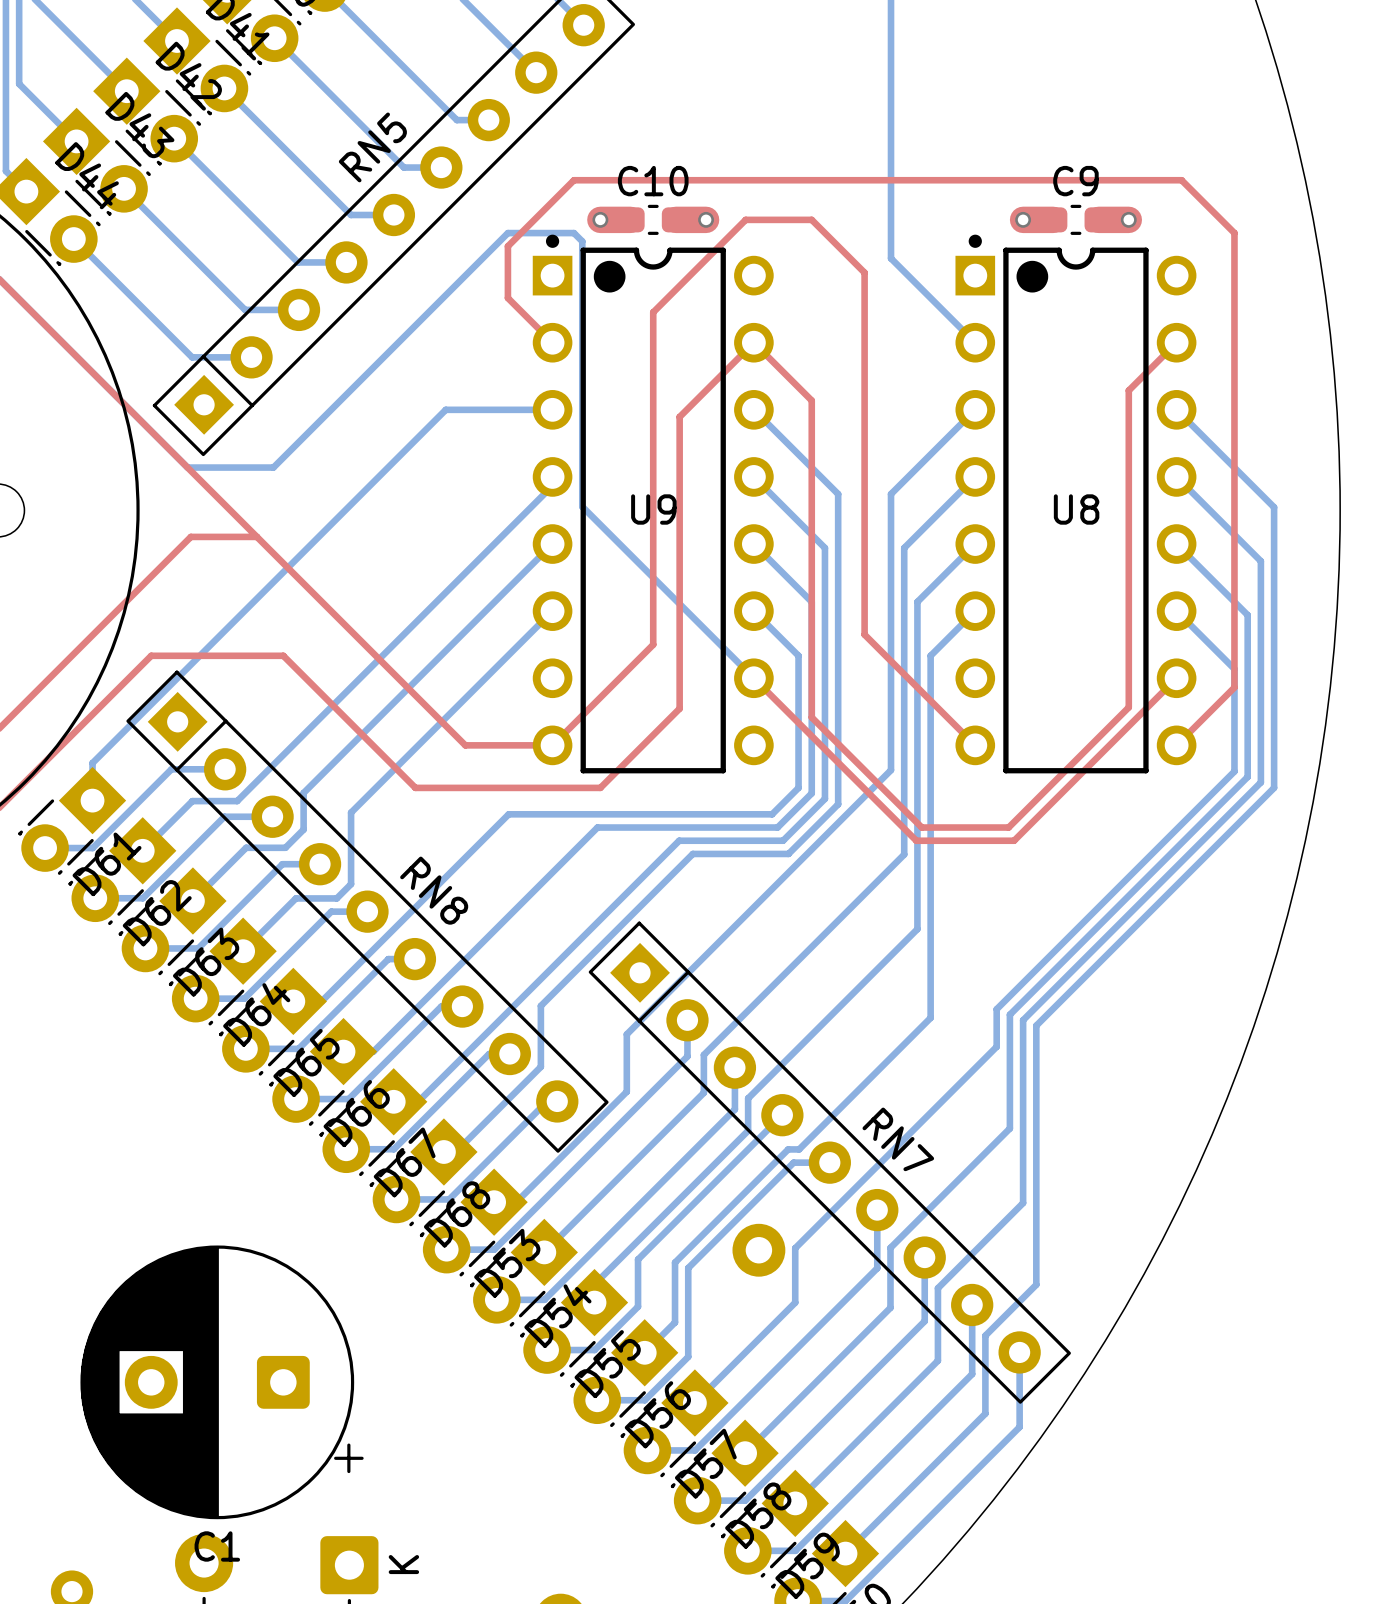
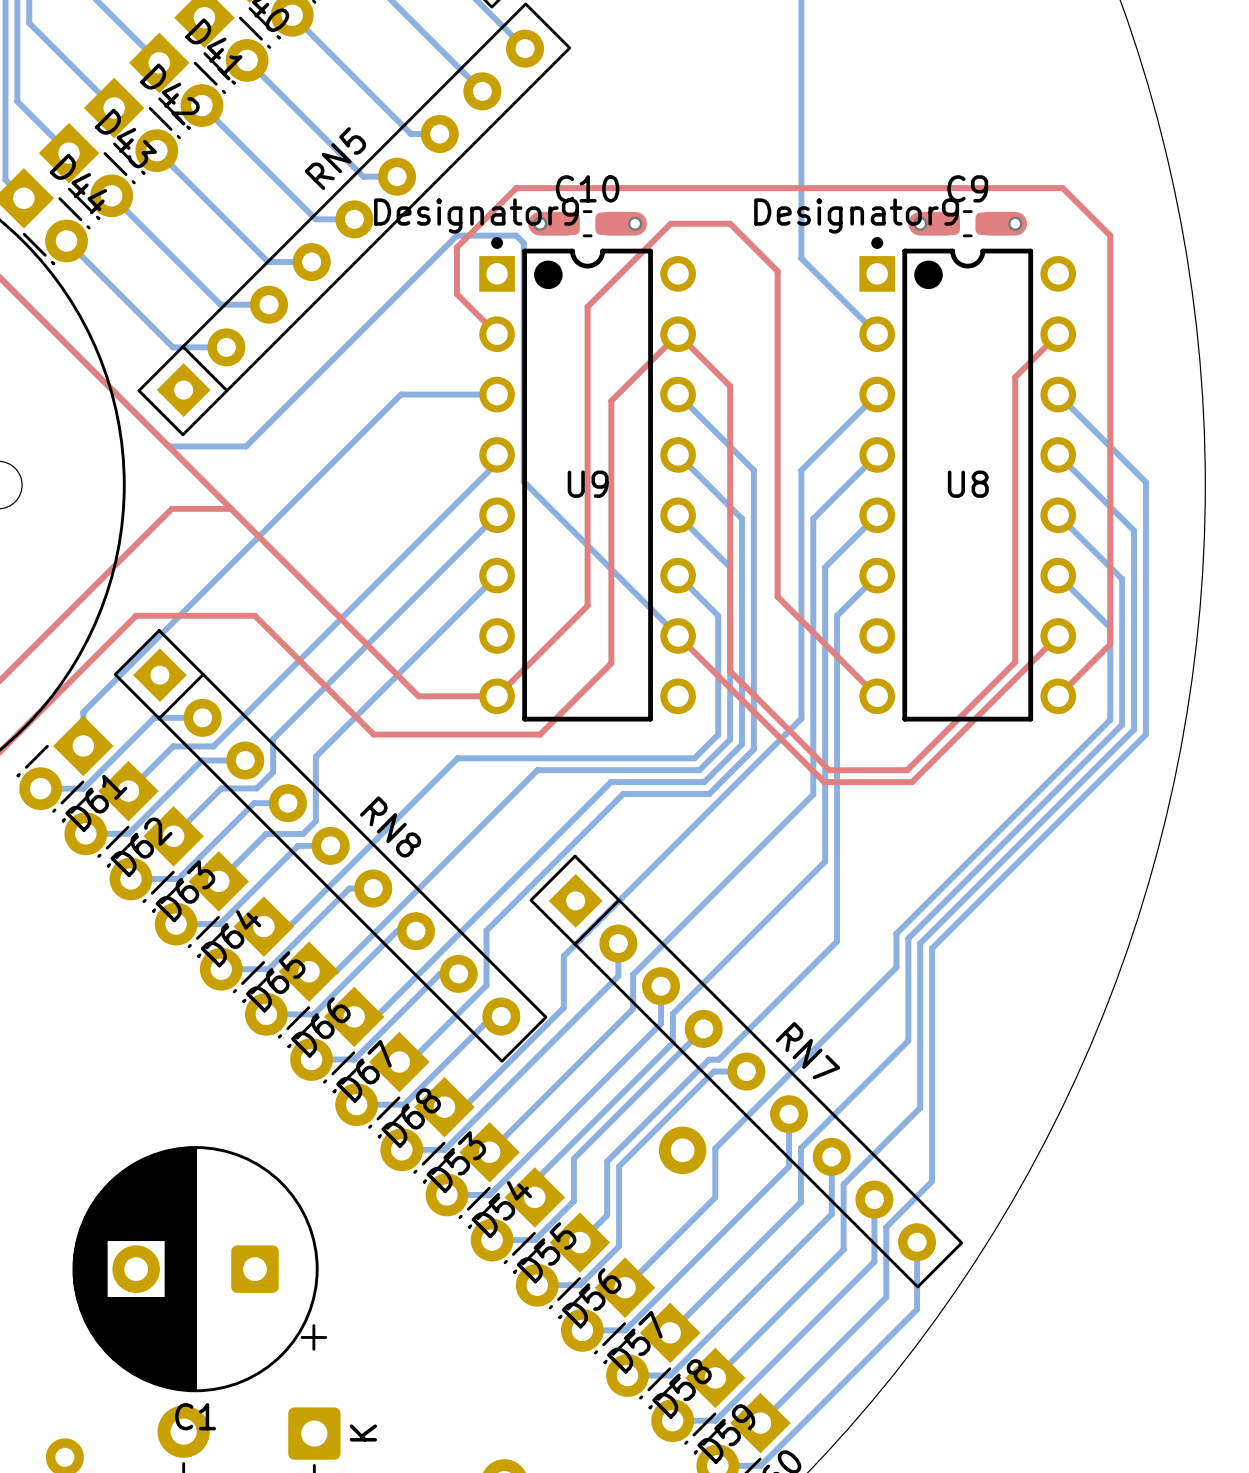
U9 text: none -> Designator9 (476, 215)
U8 text: none -> Designator9 (856, 215)

